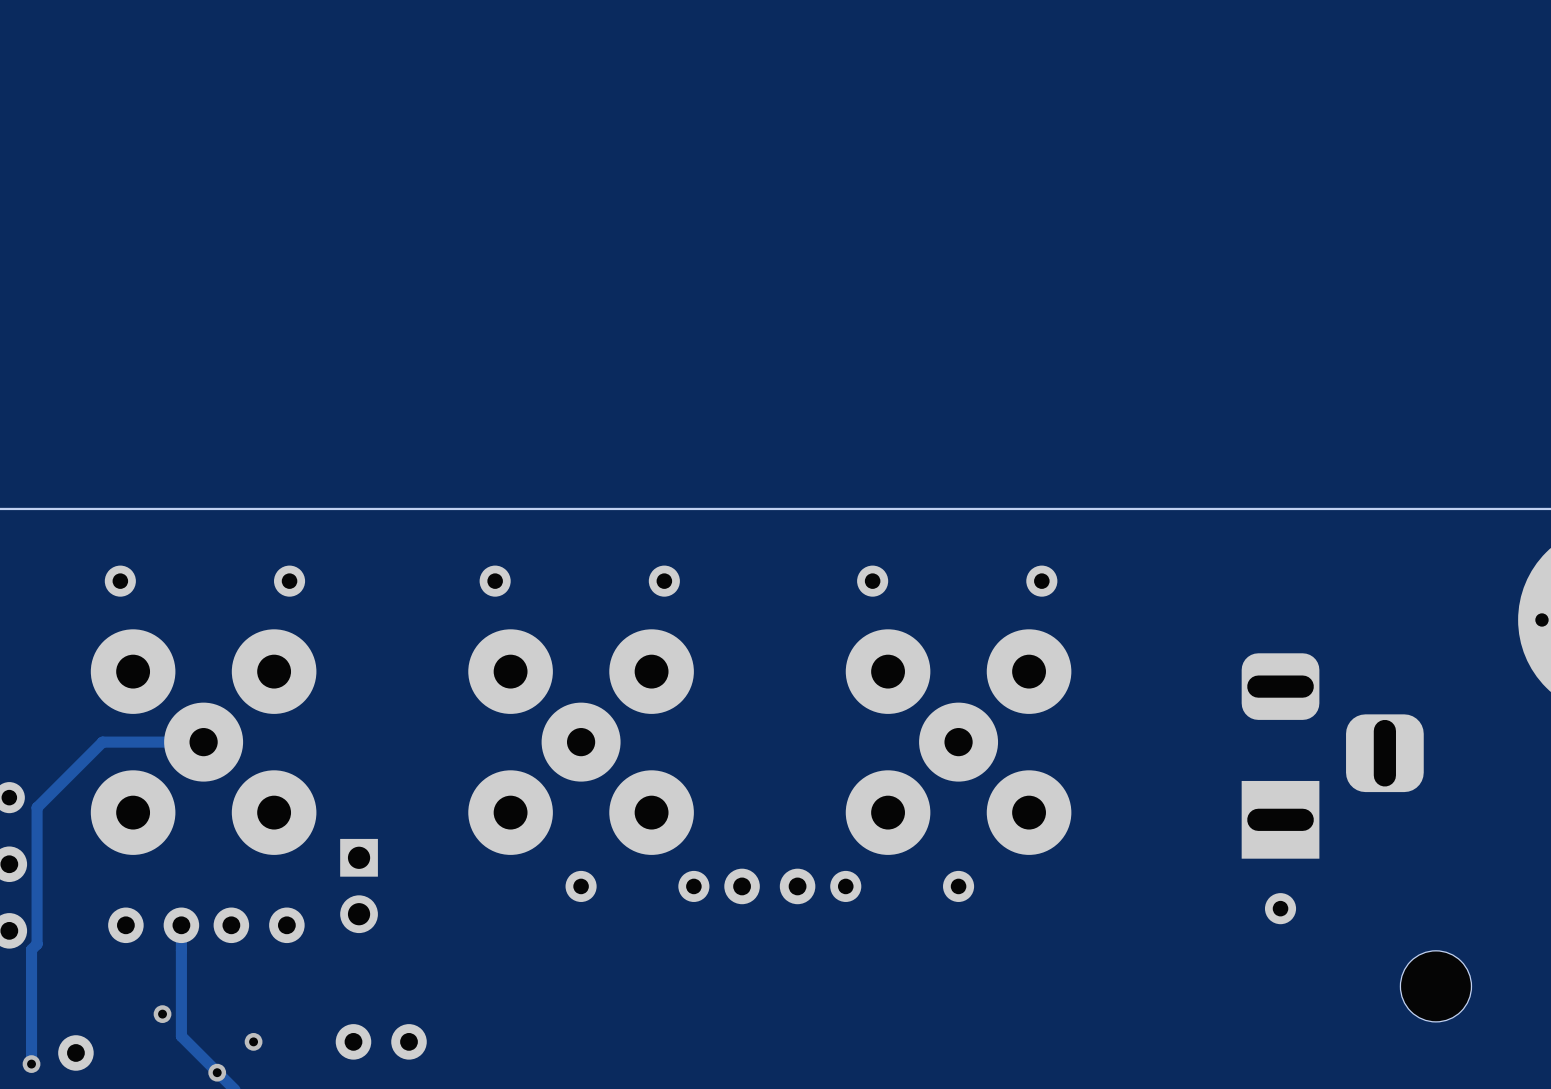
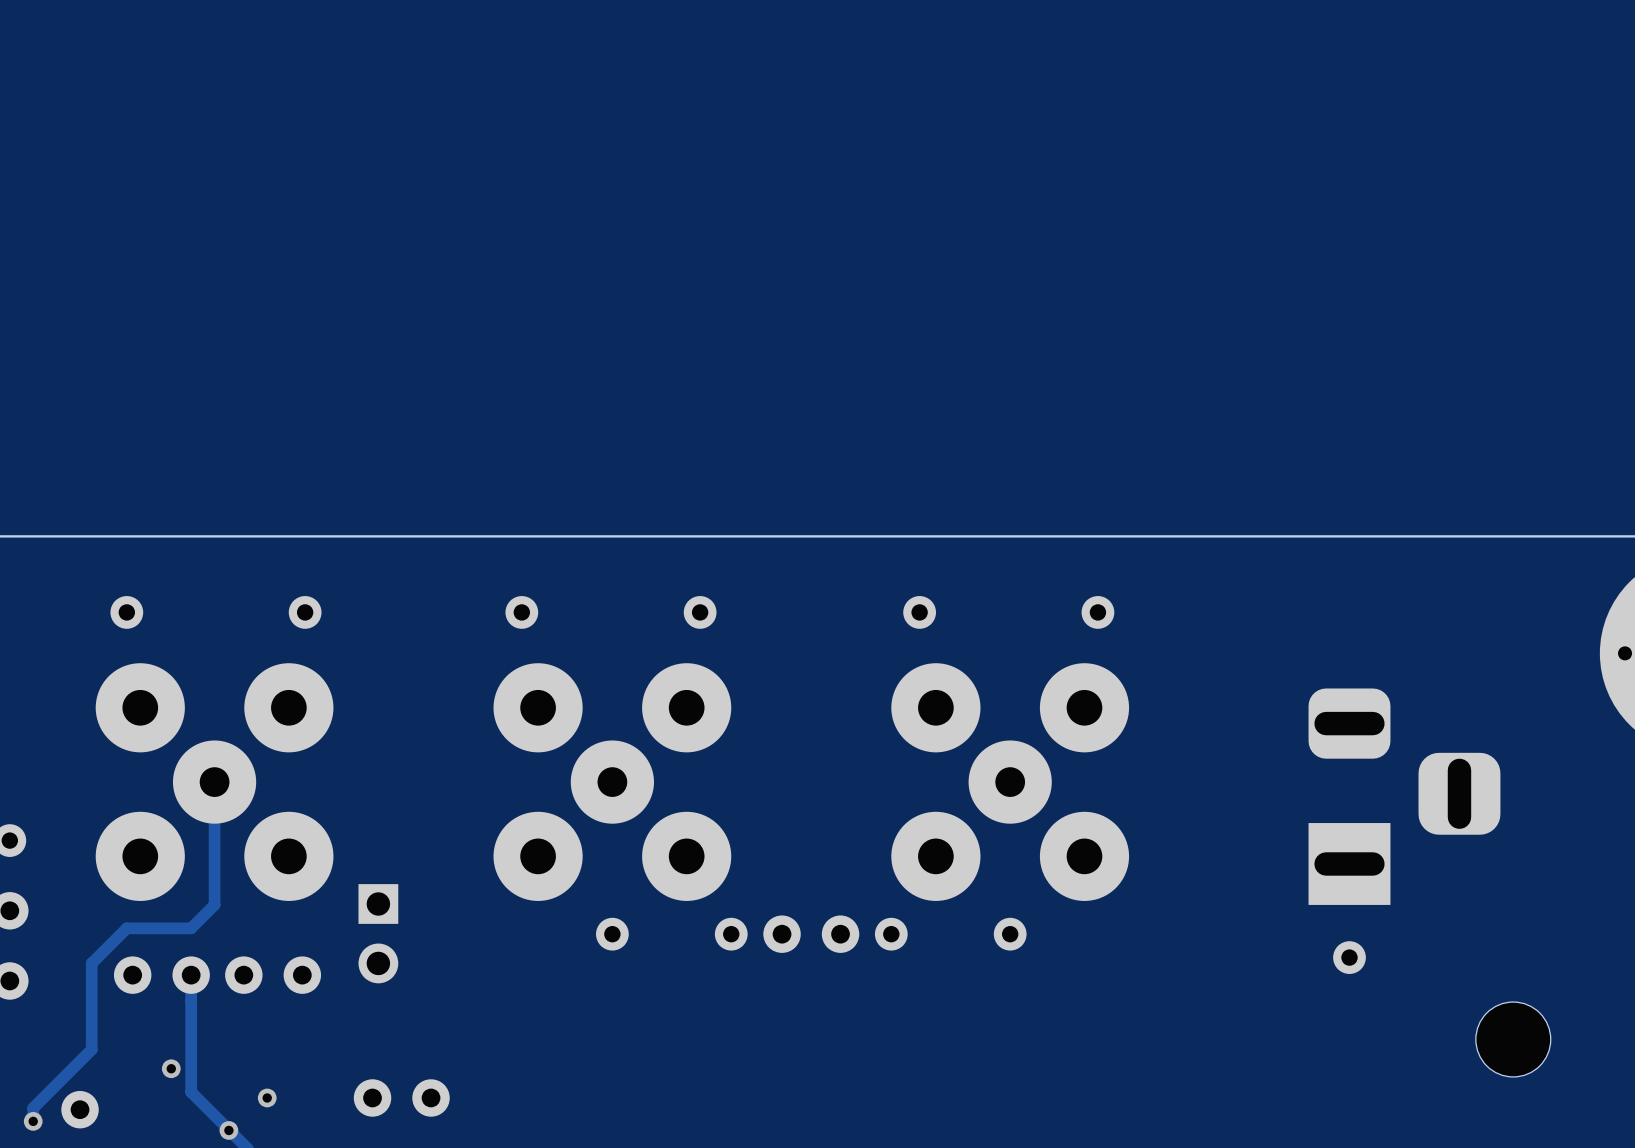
track: (203, 742) (102, 742) (37, 807) (37, 944) (31, 949) (31, 1051) -> (214, 782) (214, 904) (191, 928) (126, 928) (91, 963) (91, 1049) (33, 1108)

